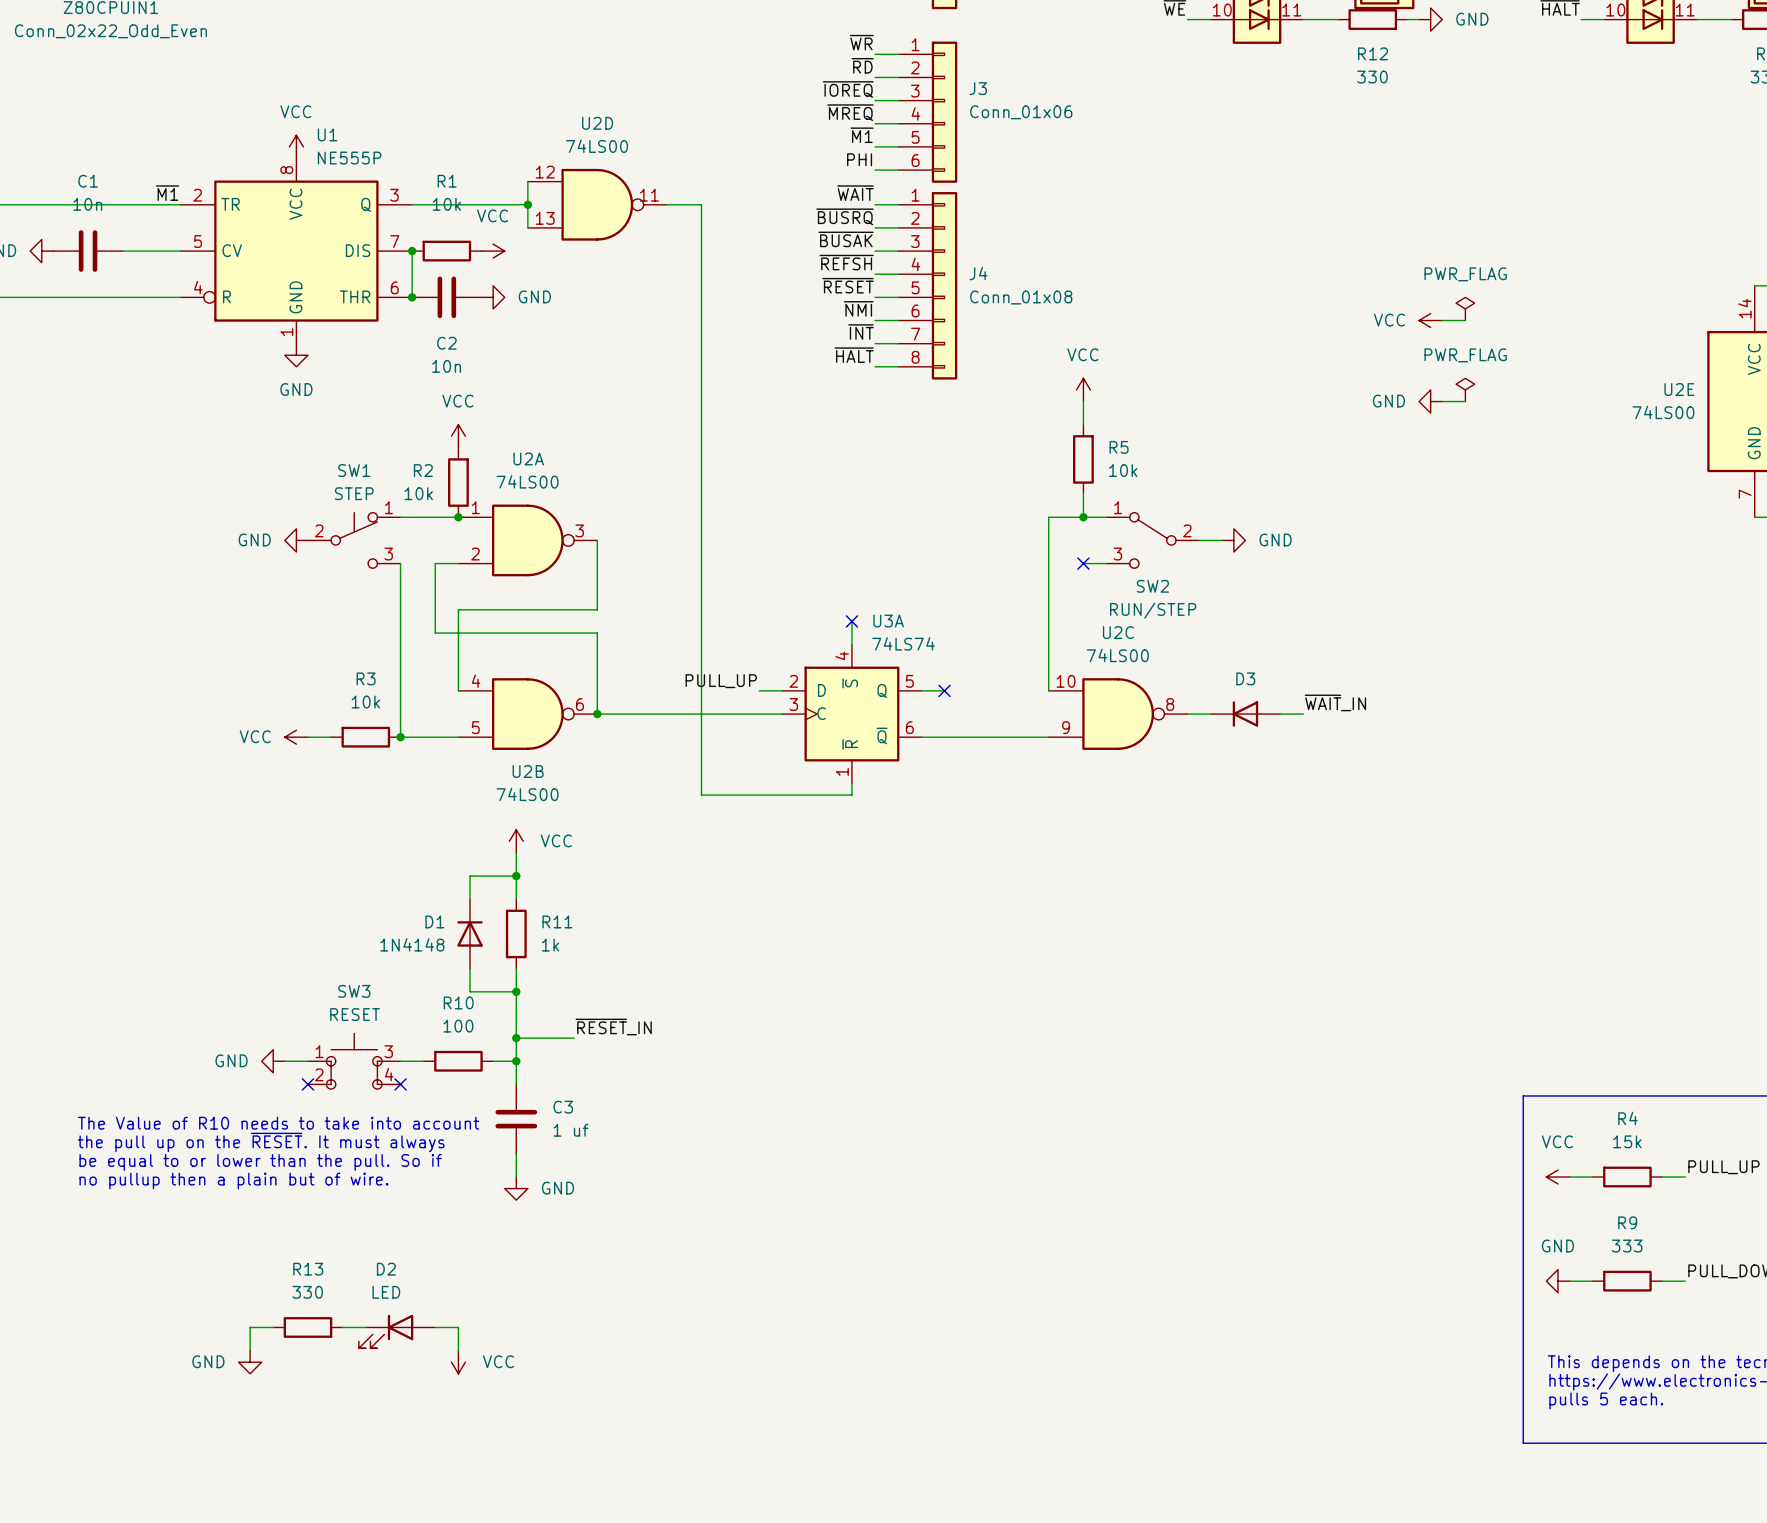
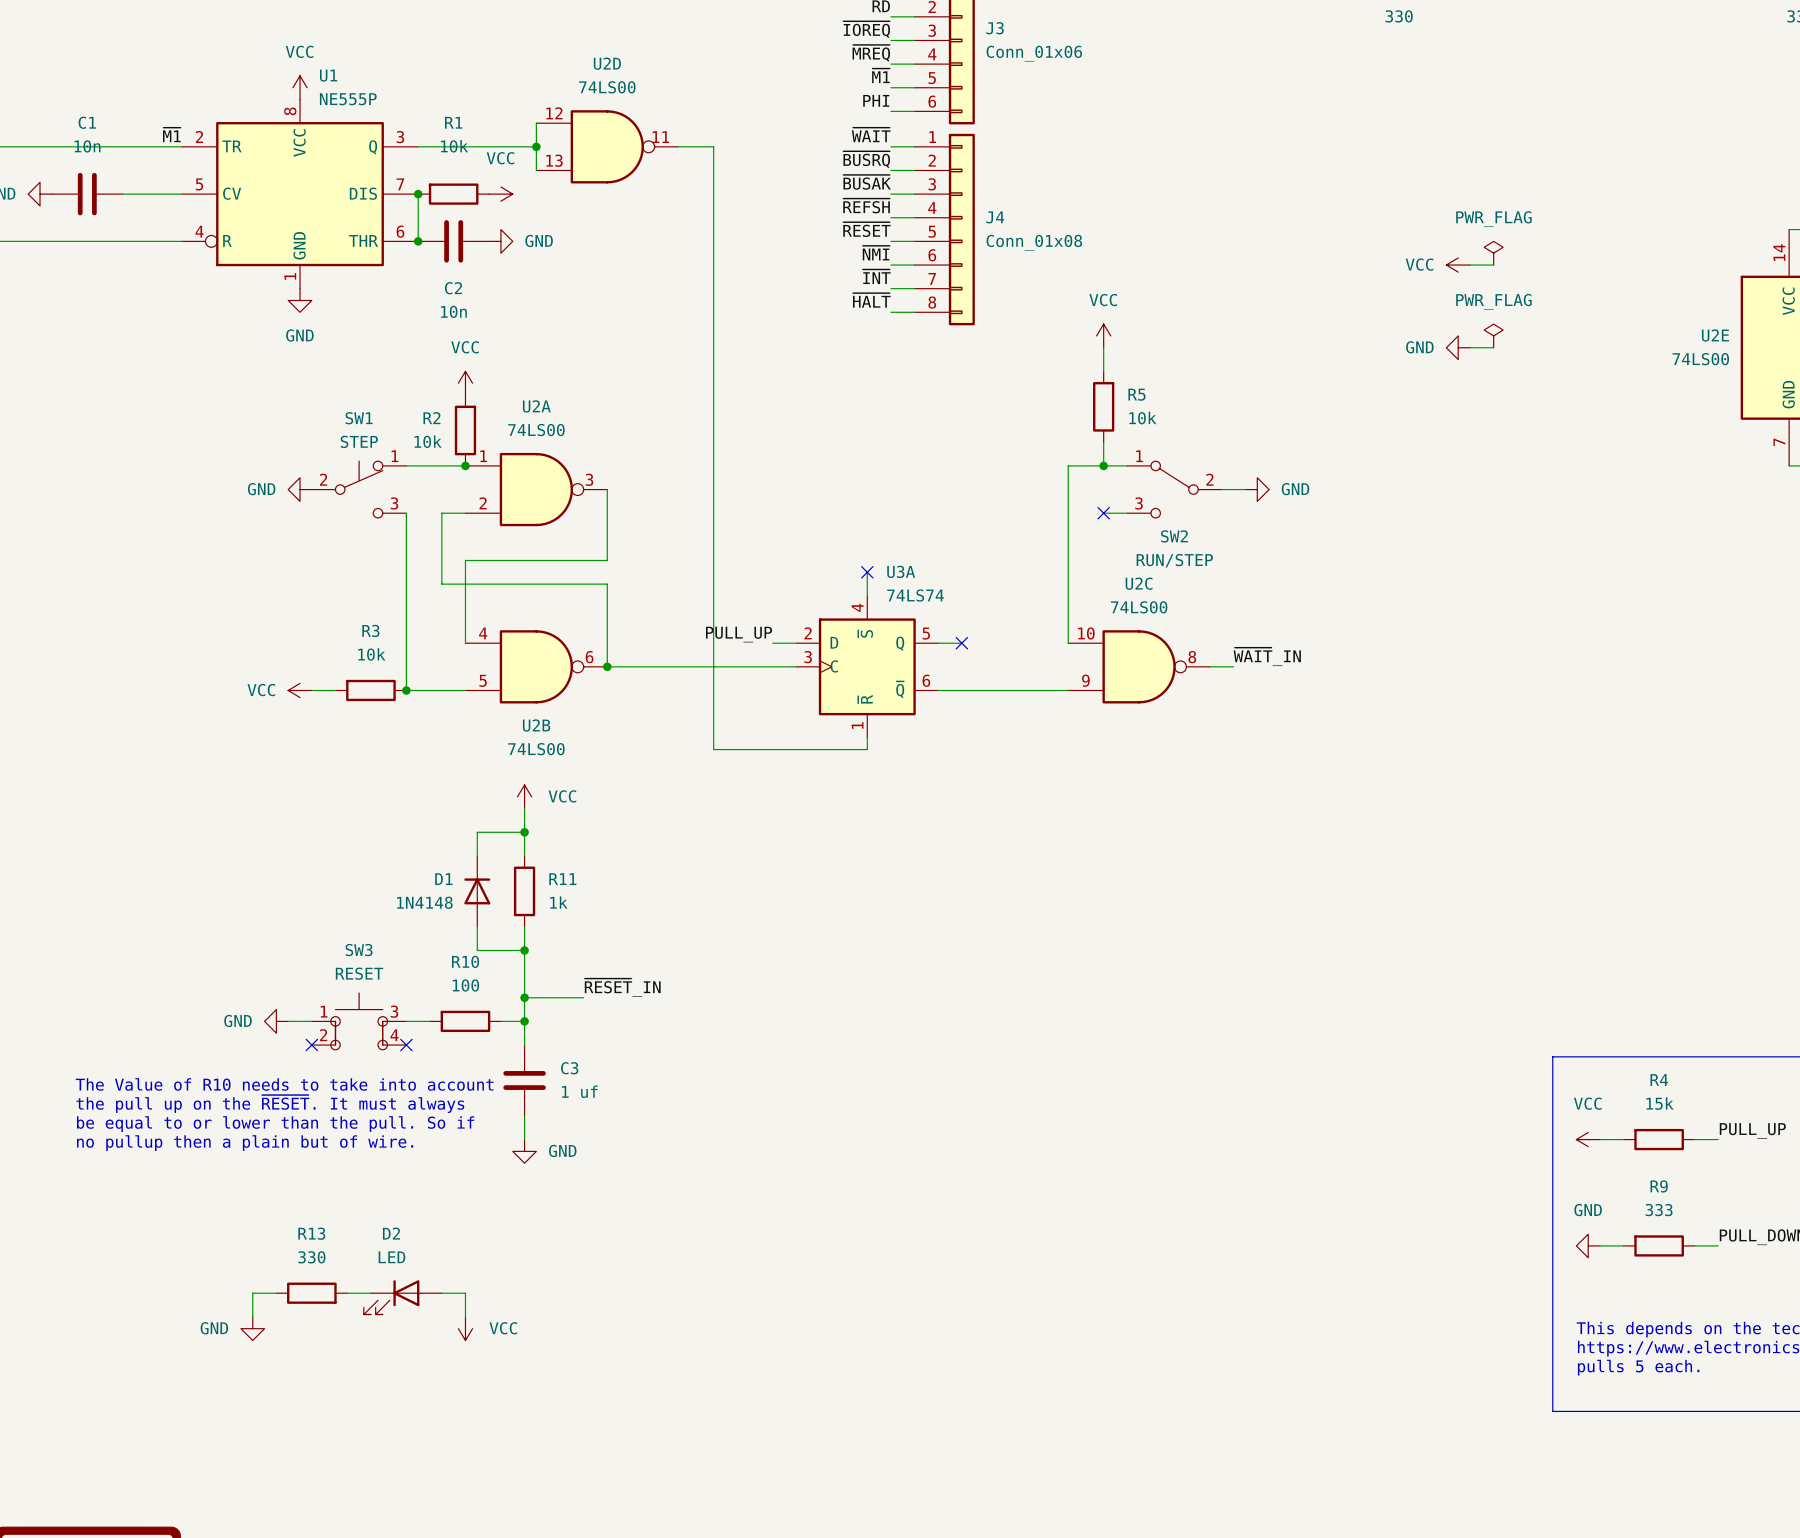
label position: ~{WAIT}_IN (1335, 702) -> ~{WAIT}_IN (1267, 656)
D3: (1245, 714) -> none
wire: (1280, 714) (1303, 714) -> none

